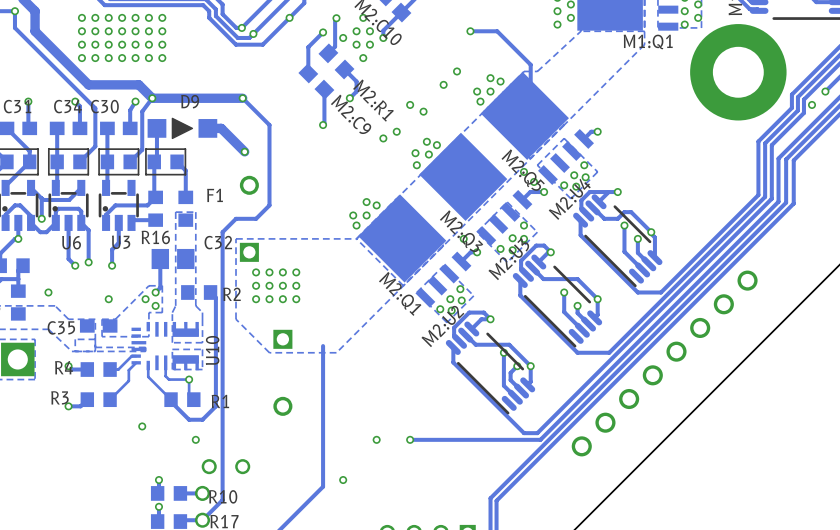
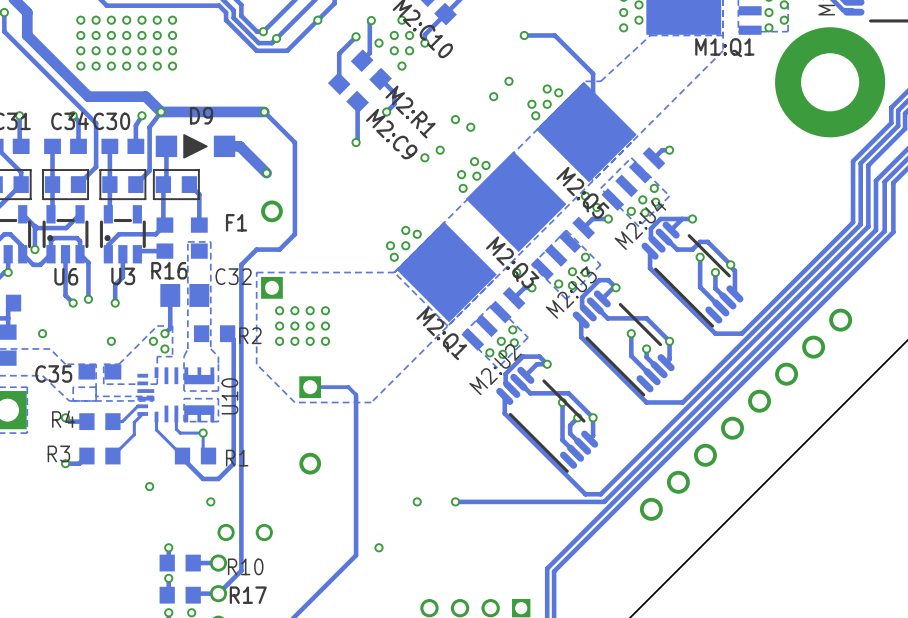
track: none -> (310, 387) (348, 387) (356, 394)

